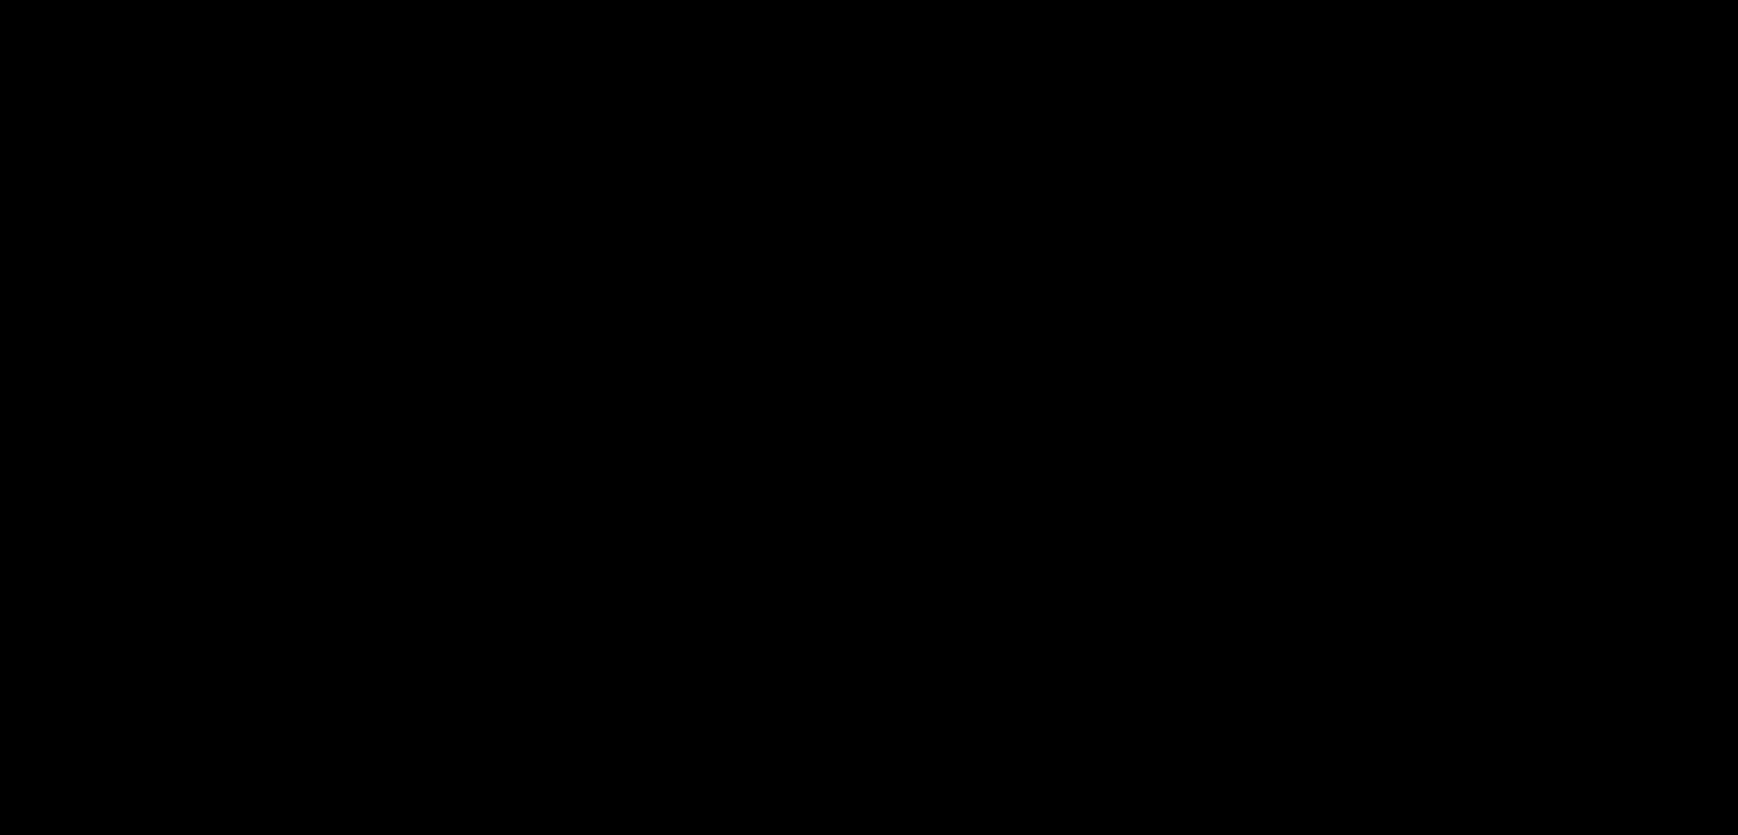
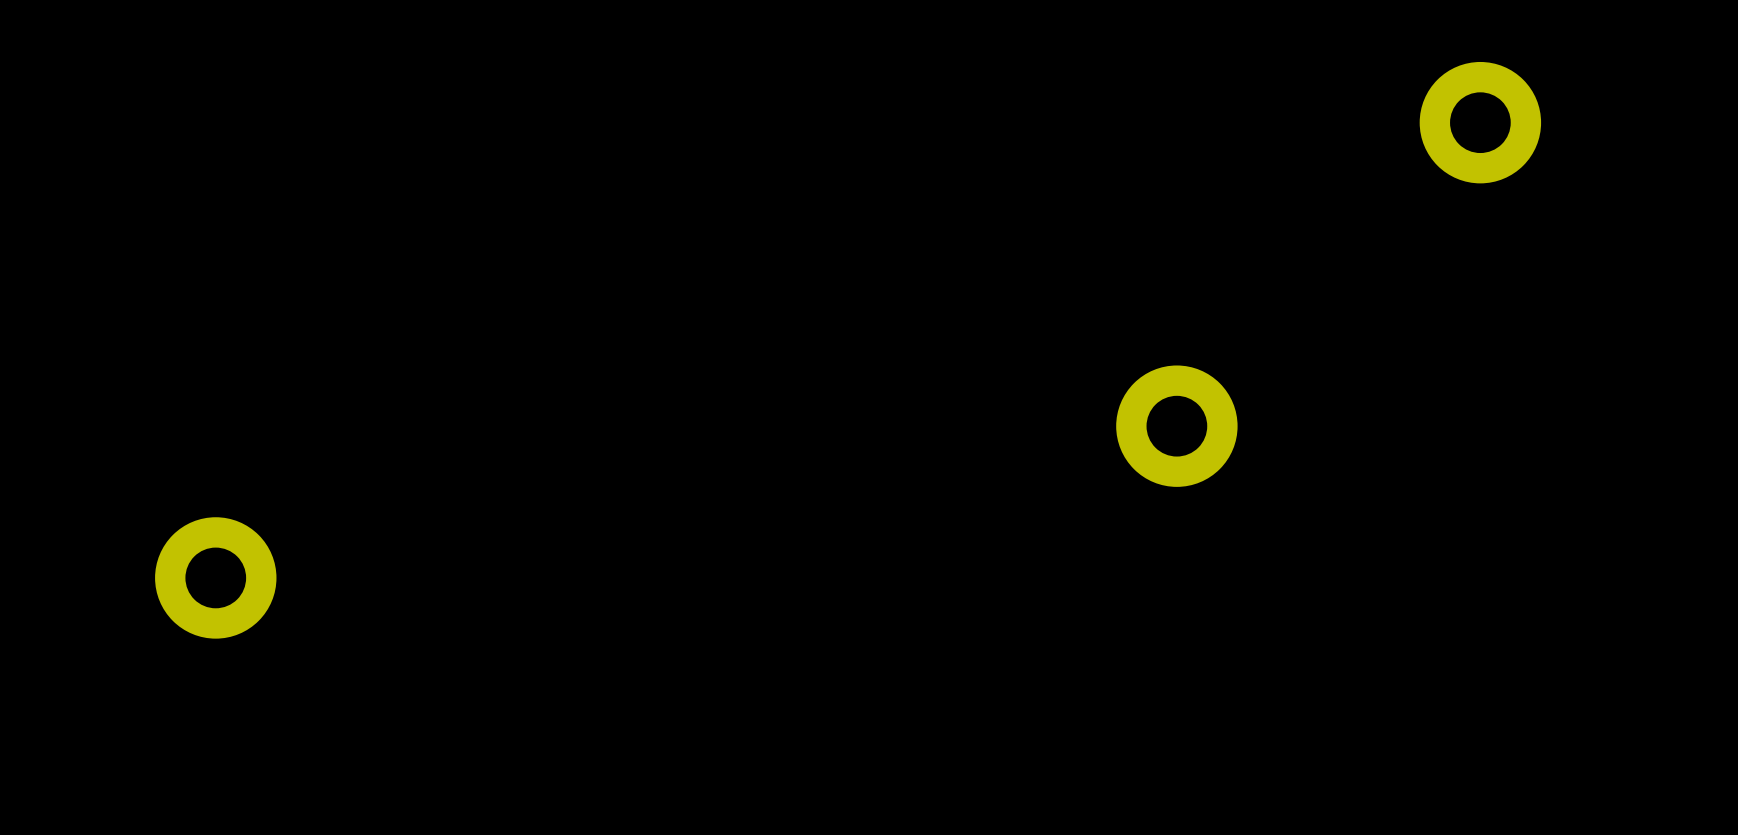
part: none -> (1480, 122)
part: none -> (1176, 426)
part: none -> (215, 577)

